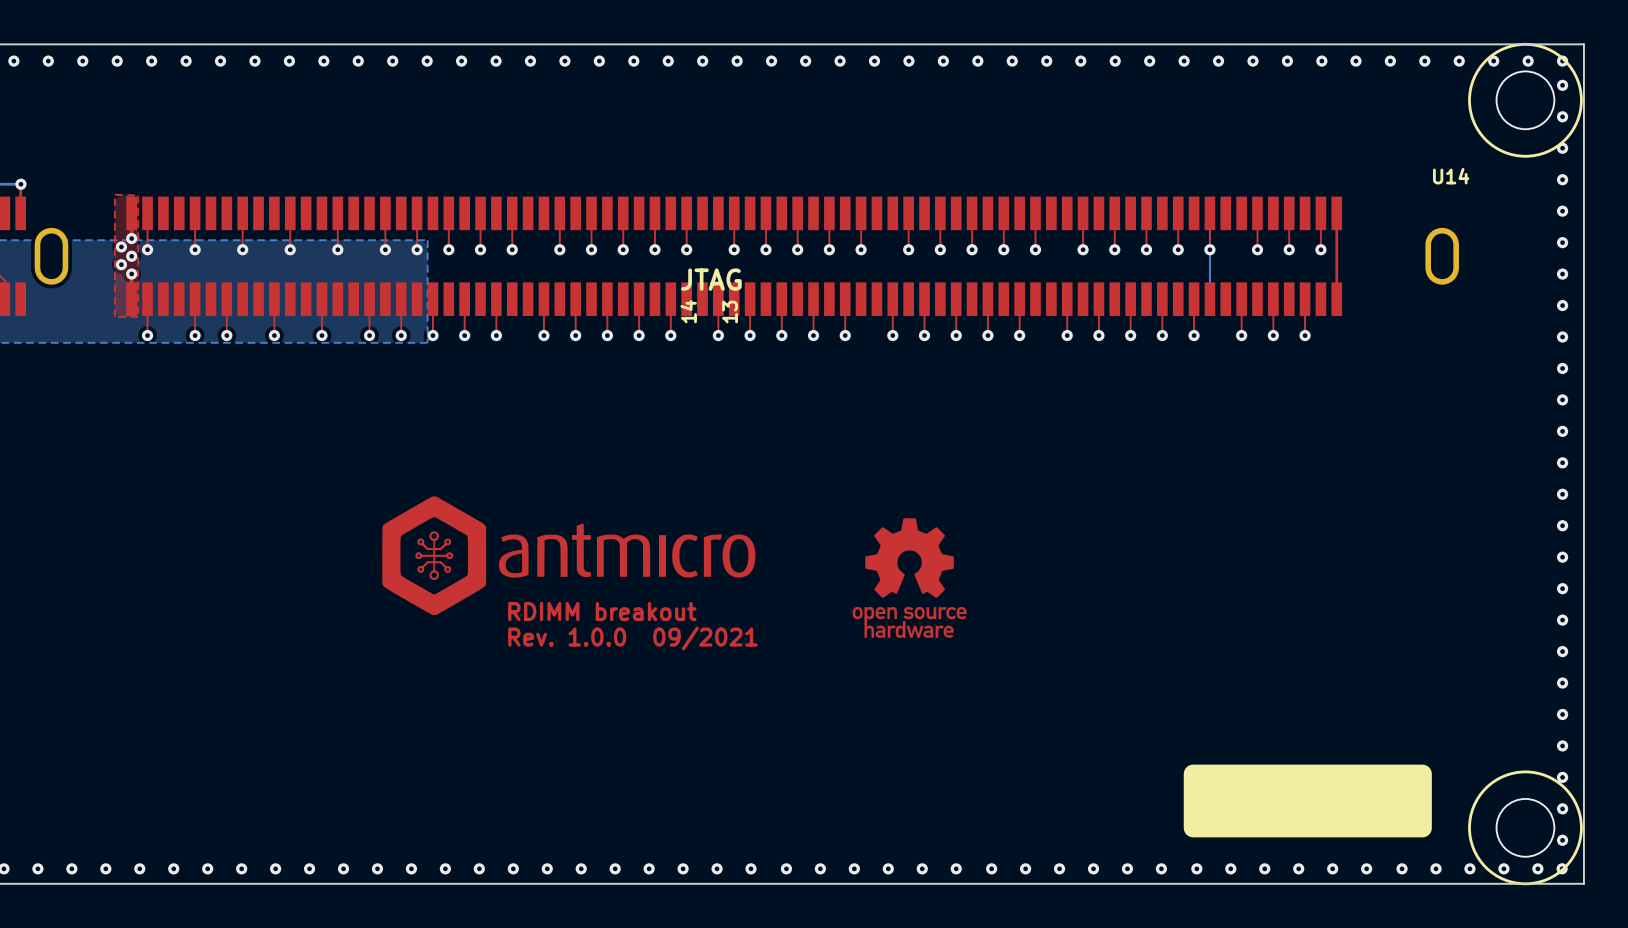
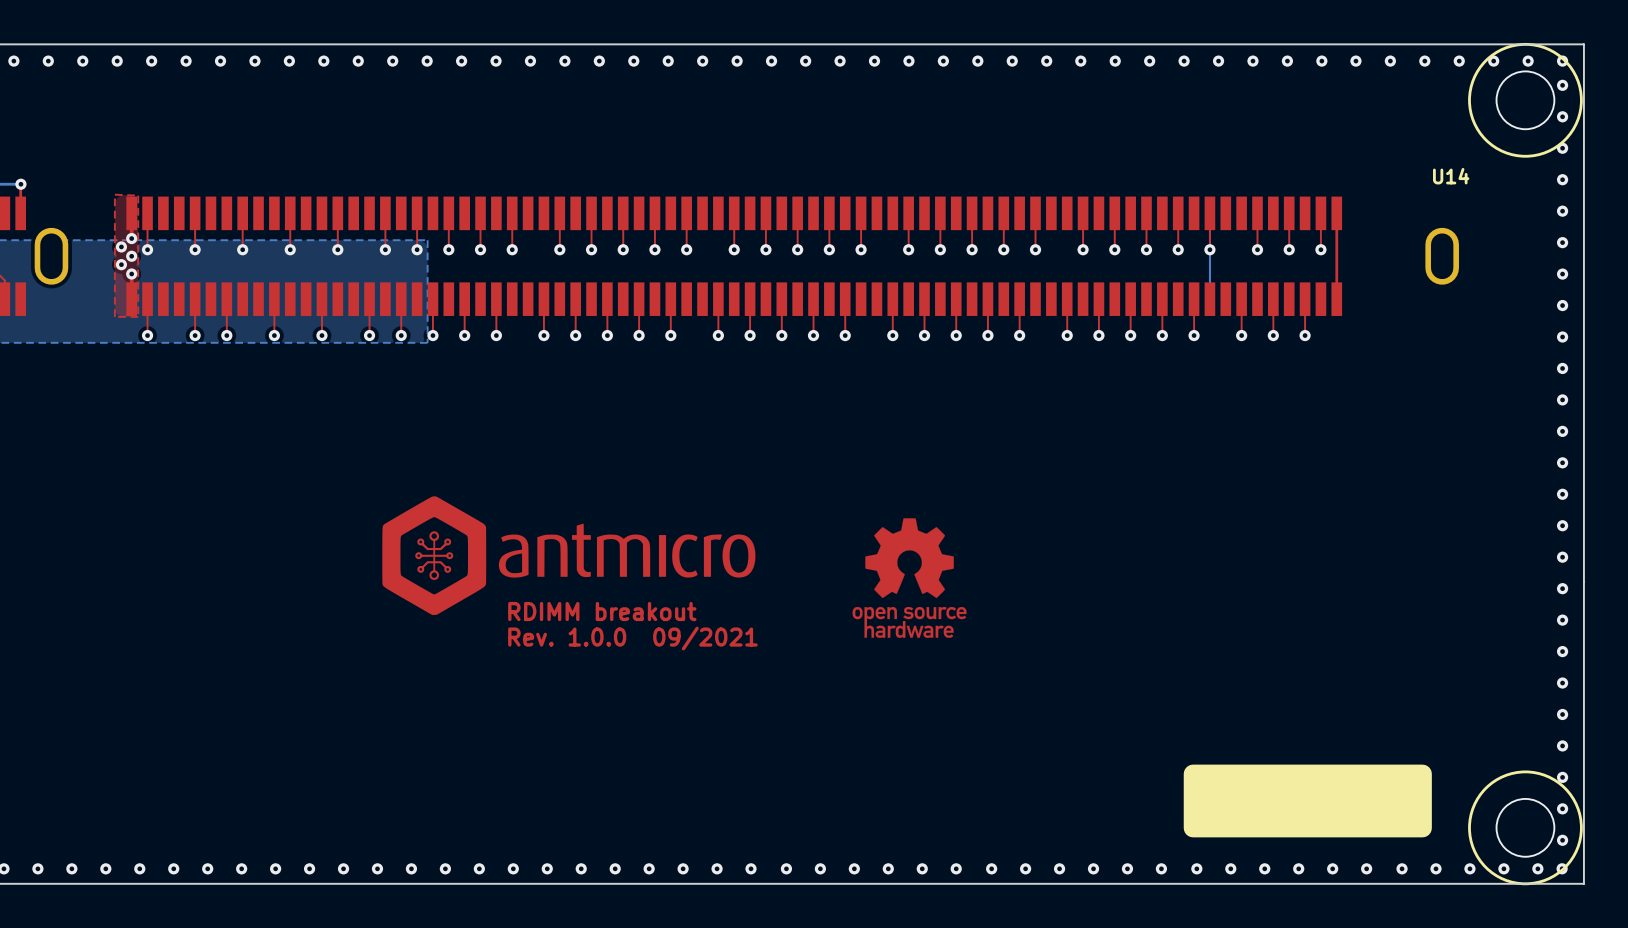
text: JTAG (711, 279) -> none
text: 14 (688, 311) -> none
text: 13 (730, 311) -> none

